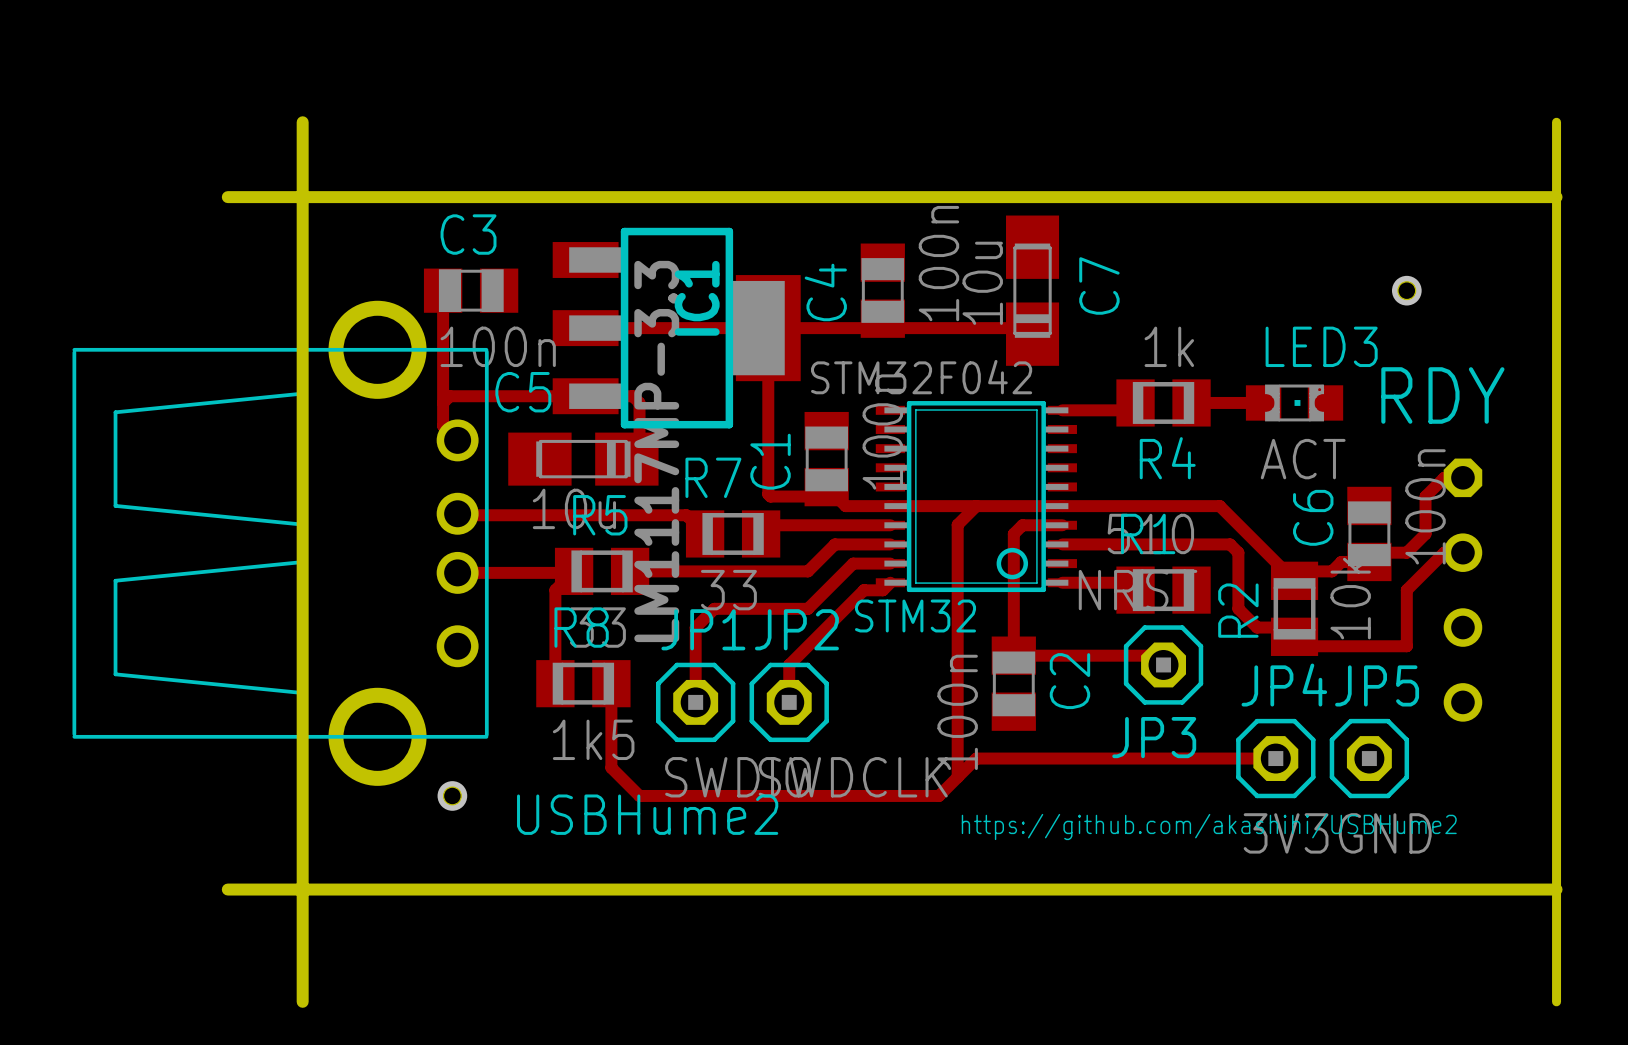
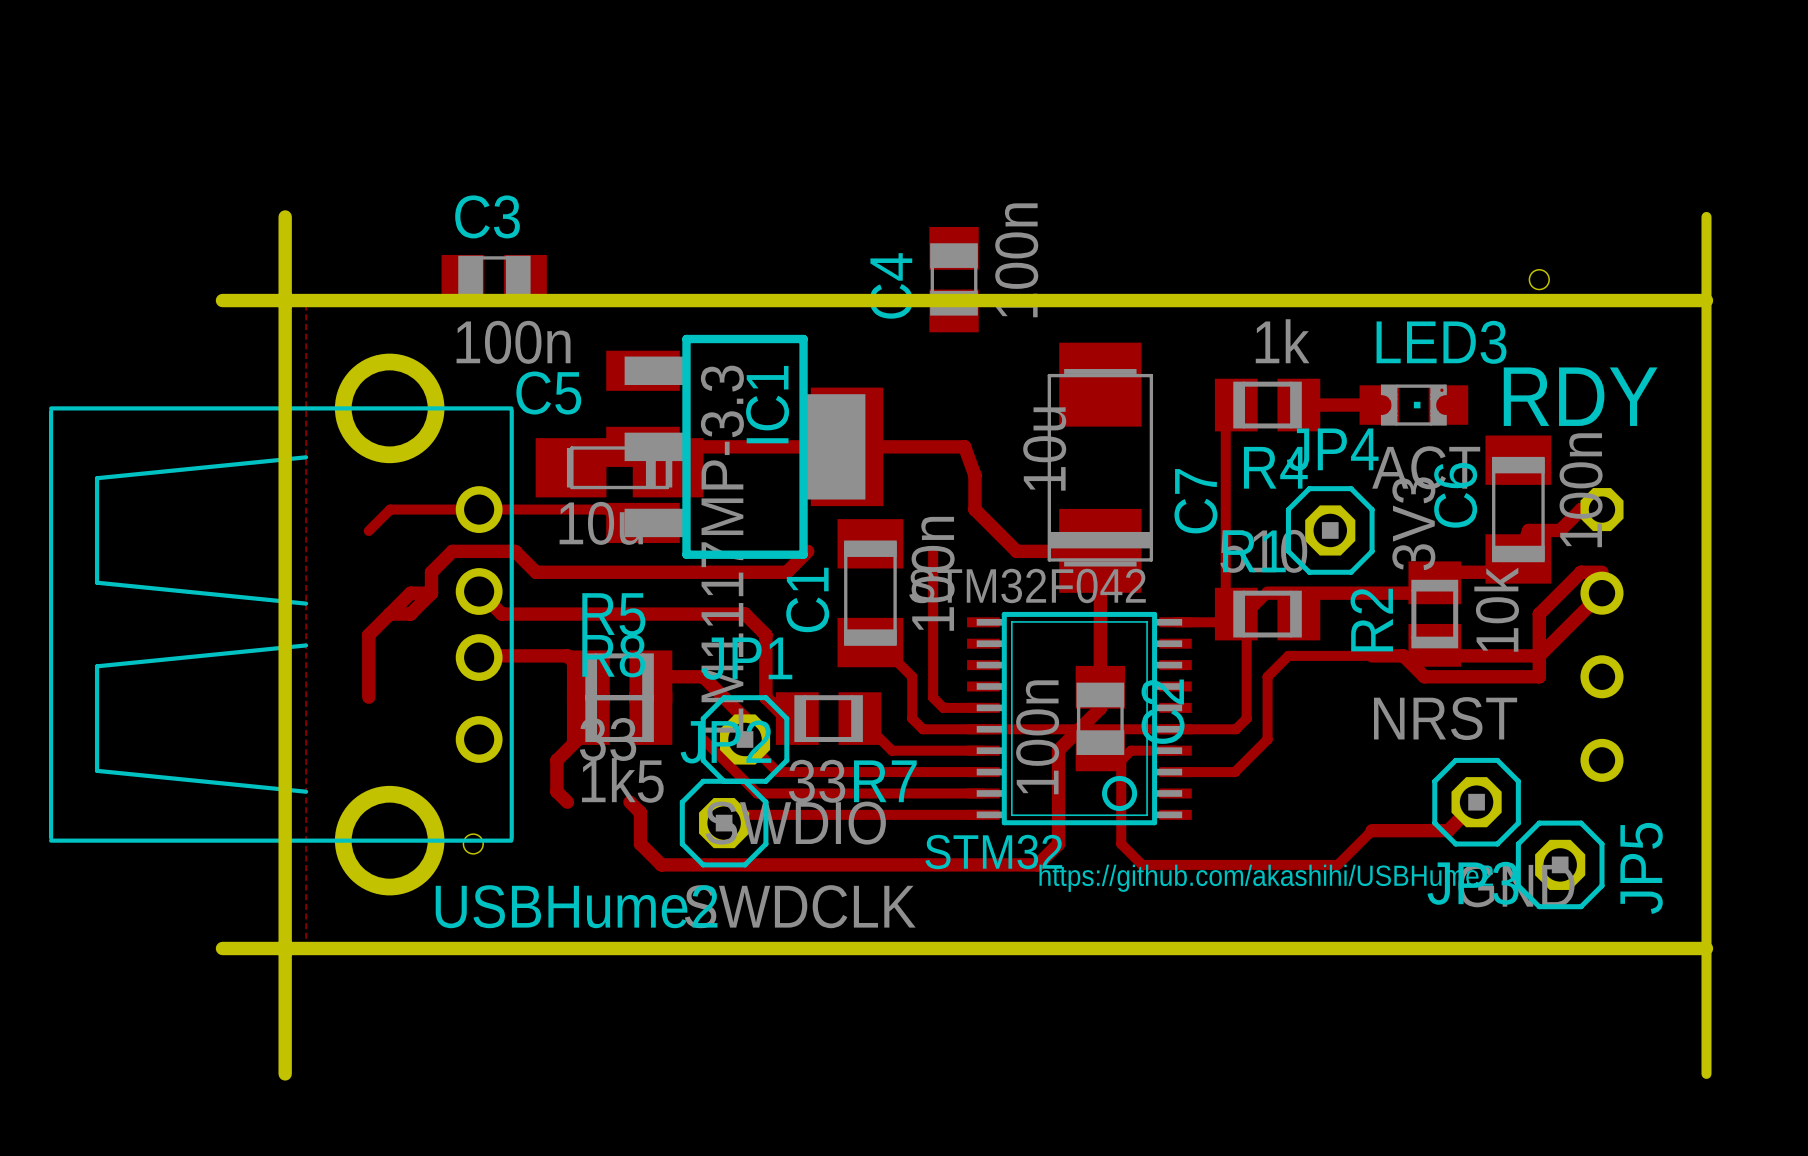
board edge: (302, 122) (302, 1001) -> none
board edge: (1556, 122) (1556, 234) -> none
board edge: (227, 197) (1556, 197) -> (222, 300) (1706, 300)
C7 footprint: [1006, 215, 1060, 366] -> [1047, 342, 1154, 593]
board edge: none -> (285, 216) (285, 1073)
top track: (443, 290) (443, 425) (457, 440) -> none
via: (1406, 290) -> none
top track: (585, 328) (873, 328) (882, 318) (892, 328) (1026, 328) (1032, 334) -> none
IC1 position: (676, 328) -> (744, 446)
top track: (768, 328) (768, 494) (770, 496) (817, 496) (826, 487) (845, 506) (1219, 506) (1294, 580) (1303, 571) (1331, 571) (1341, 561) (1369, 561) (1378, 552) (1406, 552) (1425, 533) (1425, 496) (1444, 477) (1462, 477) -> none
top track: (443, 402) (449, 396) (632, 396) (639, 402) (639, 446) (626, 459) -> none
top track: none -> (1246, 405) (1225, 405) (1225, 614) (1217, 622) (1175, 622)
top track: (1062, 410) (1135, 410) -> none
C1 footprint: [804, 411, 849, 507] -> [837, 519, 904, 668]
R7 name position: R7 (713, 477) -> R7 (885, 781)
C6 footprint: [1347, 486, 1392, 582] -> [1485, 435, 1552, 584]
STM32 position: (976, 496) -> (1079, 718)
top track: none -> (1601, 509) (1581, 509) (1560, 530) (1528, 530) (1518, 558) (1486, 572) (1434, 572) (1434, 582) (1424, 593) (1267, 593) (1246, 614) (1246, 718) (1235, 729) (922, 729) (912, 718) (912, 676) (891, 655) (883, 655) (870, 642)
top track: (976, 506) (957, 524) (957, 777) -> none
top track: none -> (643, 522) (608, 509) (390, 509) (368, 530)
top track: (457, 513) (686, 515) (705, 533) -> none
top track: (890, 525) (769, 525) (761, 533) -> none
top track: (1062, 525) (1022, 525) (1013, 533) -> (643, 446) (964, 446) (974, 475) (974, 509) (1016, 551) (1100, 550)
R7 position: (733, 533) -> (828, 718)
top track: none -> (807, 551) (786, 572) (536, 572) (515, 551) (452, 551) (431, 572) (431, 593)
top track: none -> (933, 551) (933, 697) (943, 707) (983, 707)
part position: (280, 543) -> (281, 624)
top track: (890, 544) (834, 544) (807, 571) (630, 571) -> none
top track: (1062, 544) (1230, 544) (1238, 552) (1238, 608) (1257, 627) -> (1175, 772) (1234, 772) (1267, 739) (1267, 676) (1288, 655) (1372, 655)
top track: (890, 563) (853, 563) (807, 608) (714, 608) (695, 627) (695, 683) -> (650, 676) (703, 676) (745, 718)
top track: none -> (479, 591) (501, 614) (745, 614) (765, 634) (765, 697) (786, 718) (807, 718)
top track: none -> (431, 593) (410, 614) (389, 614)
top track: none -> (431, 593) (410, 593) (368, 634) (368, 697)
top track: (574, 571) (555, 590) (555, 646) -> (479, 657) (480, 655) (567, 655) (588, 676)
R5 position: (602, 571) -> (619, 676)
top track: none -> (1601, 593) (1539, 655) (1445, 655) (1424, 634)
top track: (457, 572) (572, 572) -> none
top track: (890, 582) (882, 590) (864, 590) -> none
top track: (1062, 582) (1128, 582) (1135, 590) -> none
top track: (864, 590) (789, 664) (789, 702) -> none
part position: (1462, 590) -> (1601, 634)
R2 position: (1294, 608) -> (1434, 614)
STM32 name position: STM32 (915, 616) -> STM32 (993, 852)
top track: (1013, 655) (1154, 655) (1163, 664) -> (1100, 687) (1100, 708) (1058, 750) (1058, 843) (1037, 864) (661, 864) (640, 843) (640, 812) (629, 802)
JP3 position: (1163, 664) -> (1476, 802)
top track: none -> (588, 718) (588, 728) (556, 760) (556, 791) (567, 802)
top track: (611, 683) (611, 767) (639, 795) (938, 795) (976, 758) (1275, 758) -> none
top track: none -> (859, 718) (891, 750) (983, 750)
JP5 name rotation: 0° (1377, 685) -> 90° counterclockwise (1641, 868)
top track: none -> (703, 739) (757, 793) (983, 793)
top track: none -> (745, 739) (777, 772) (983, 772)
JP2 position: (789, 702) -> (724, 823)
top track: none -> (1175, 750) (1130, 750) (1121, 760) (1121, 843) (1142, 864) (1337, 864) (1372, 830) (1448, 830) (1476, 802)
JP4 position: (1275, 758) -> (1330, 530)
JP5 position: (1369, 758) -> (1560, 864)
top track: none -> (983, 814) (732, 814) (724, 823)
via: (452, 795) -> none
text position: USBHume2 (647, 814) -> USBHume2 (576, 906)
JP4 value rotation: 0° (1286, 833) -> 90° counterclockwise (1413, 523)

